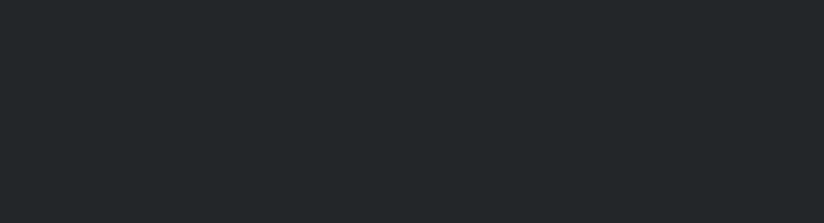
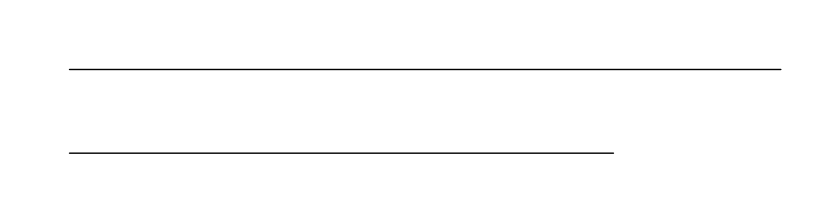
wire: none -> (69, 69) (780, 69)
wire: none -> (69, 153) (613, 153)

